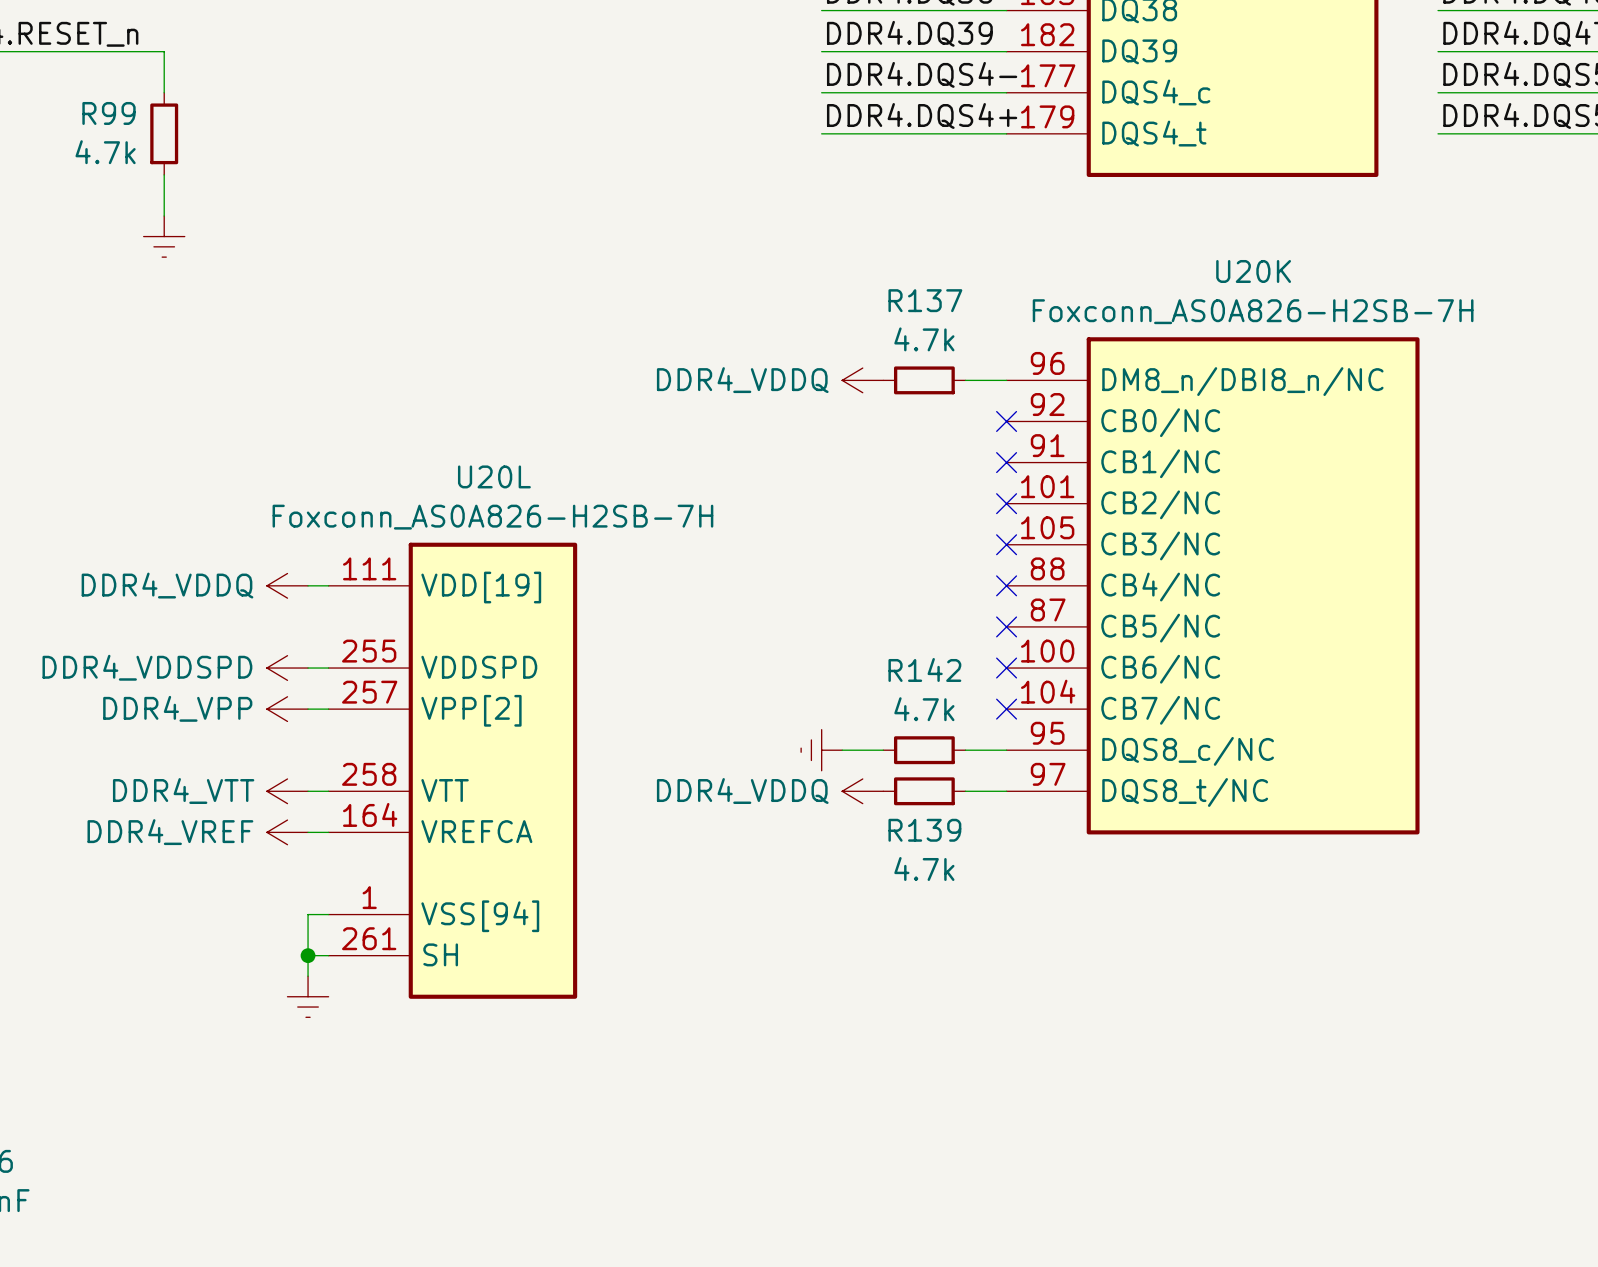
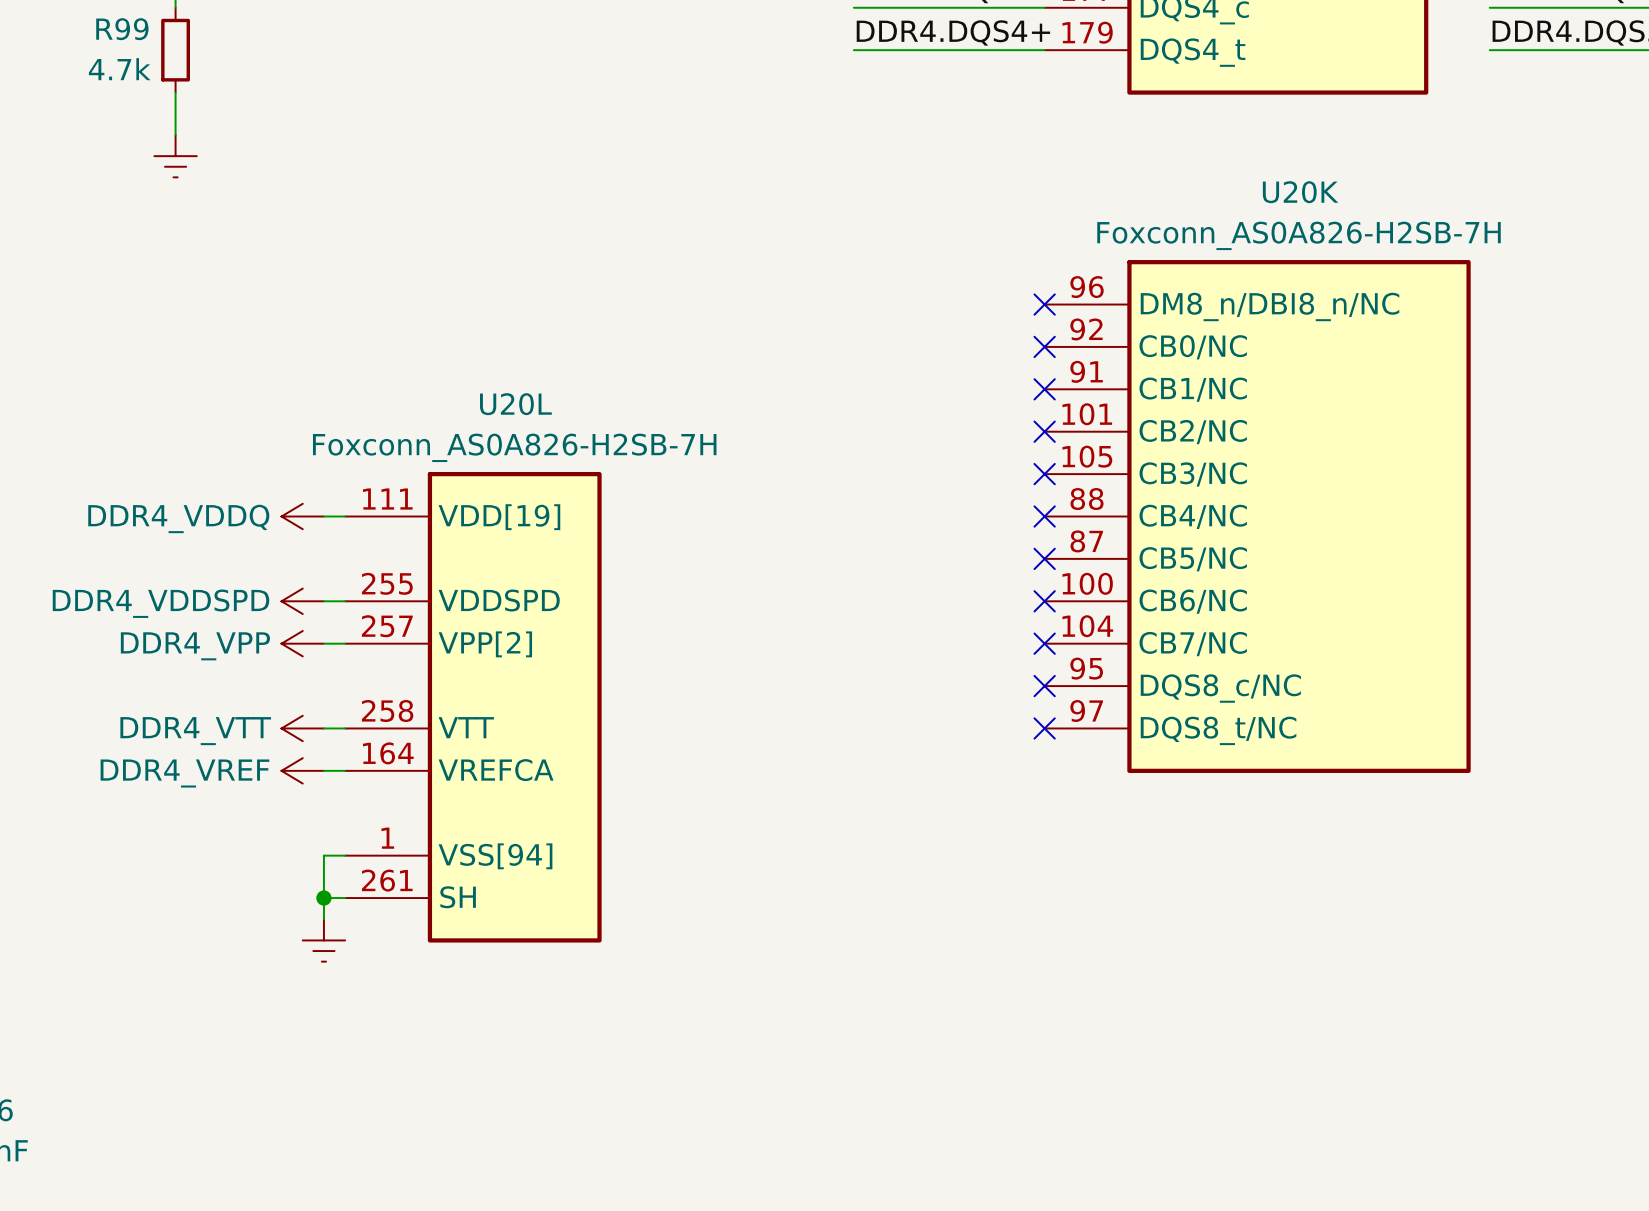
power symbol: DDR4_VDDQ (862, 380) -> none
R137: 4.7k (924, 380) -> none
wire: (965, 380) (1006, 380) -> none
no-connect mark: none -> (1044, 304)
power symbol: (821, 750) -> none
wire: (842, 750) (883, 750) -> none
R142: 4.7k (924, 750) -> none
wire: (965, 750) (1006, 750) -> none
no-connect mark: none -> (1044, 686)
power symbol: DDR4_VDDQ (862, 791) -> none
R139: 4.7k (924, 791) -> none
wire: (965, 791) (1006, 791) -> none
no-connect mark: none -> (1044, 728)

